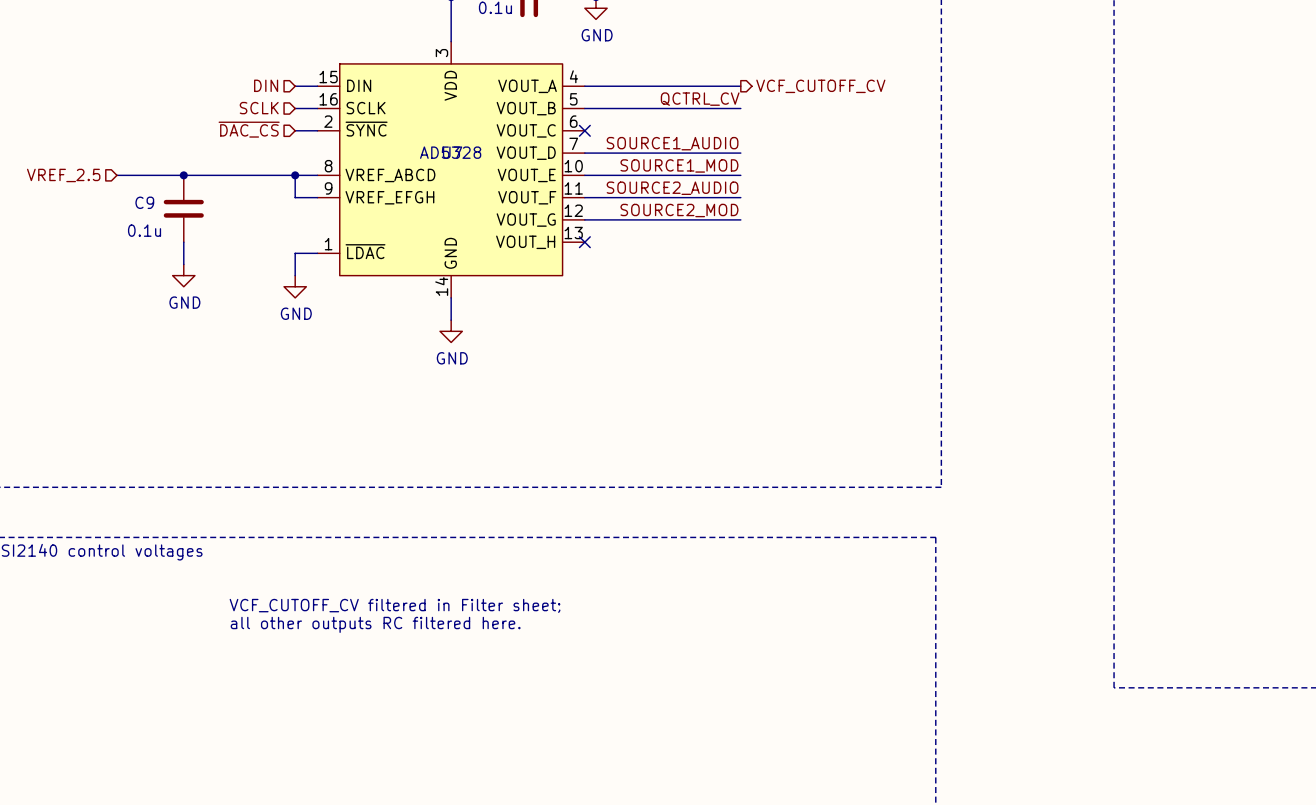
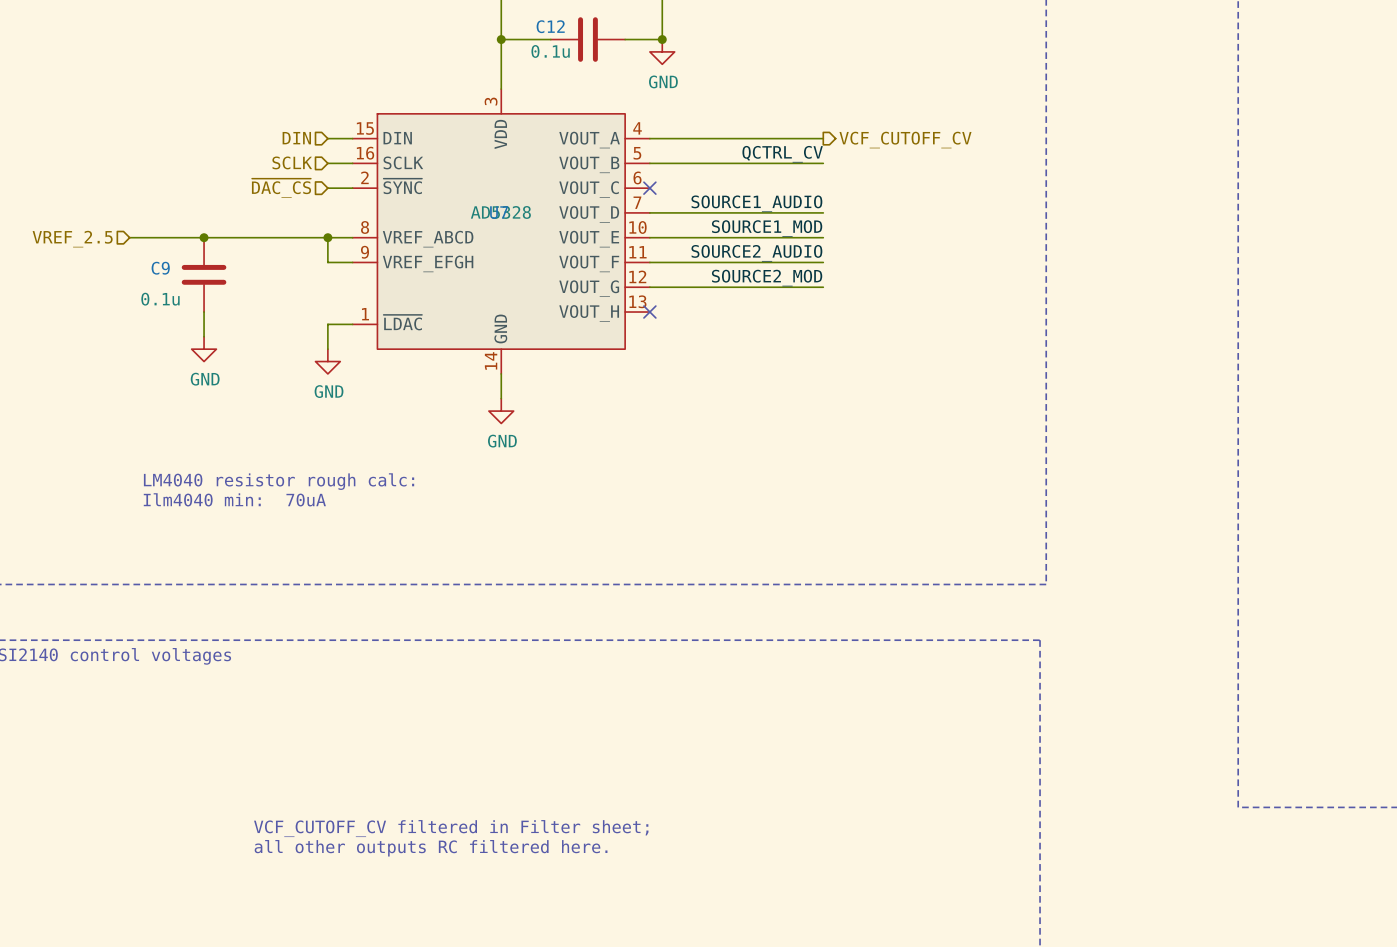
text: none -> LM4040 resistor rough calc: (279, 481)
text: none -> Ilm4040 min: 70uA (234, 499)
text position: VCF_CUTOFF_CV filtered in Filter sheet; (395, 605) -> VCF_CUTOFF_CV filtered in Filter sheet; (451, 828)
text position: all other outputs RC filtered here. (375, 624) -> all other outputs RC filtered here. (431, 848)

